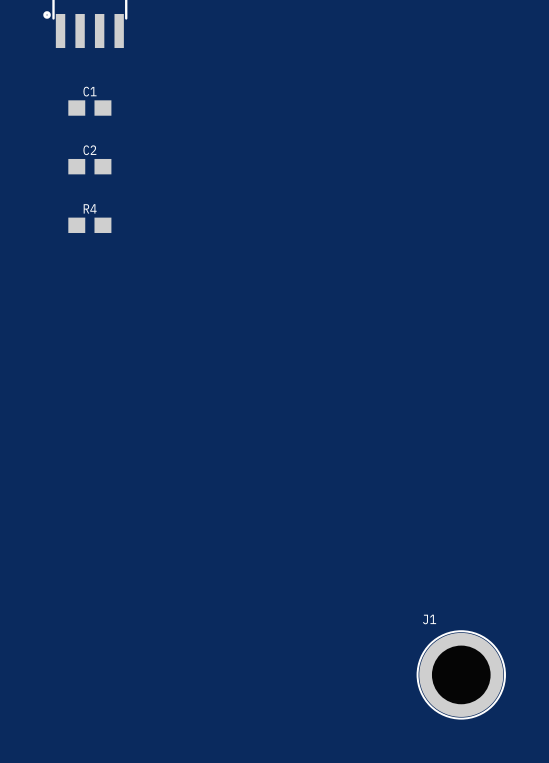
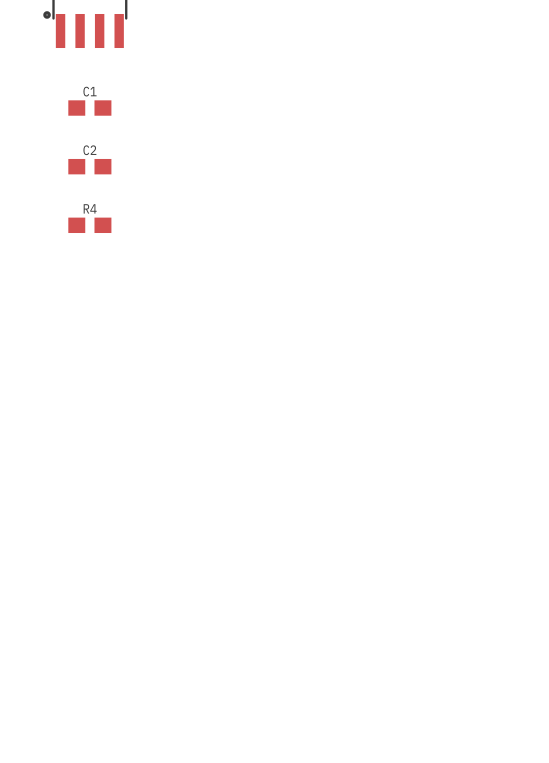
J1: (461, 674) -> none

